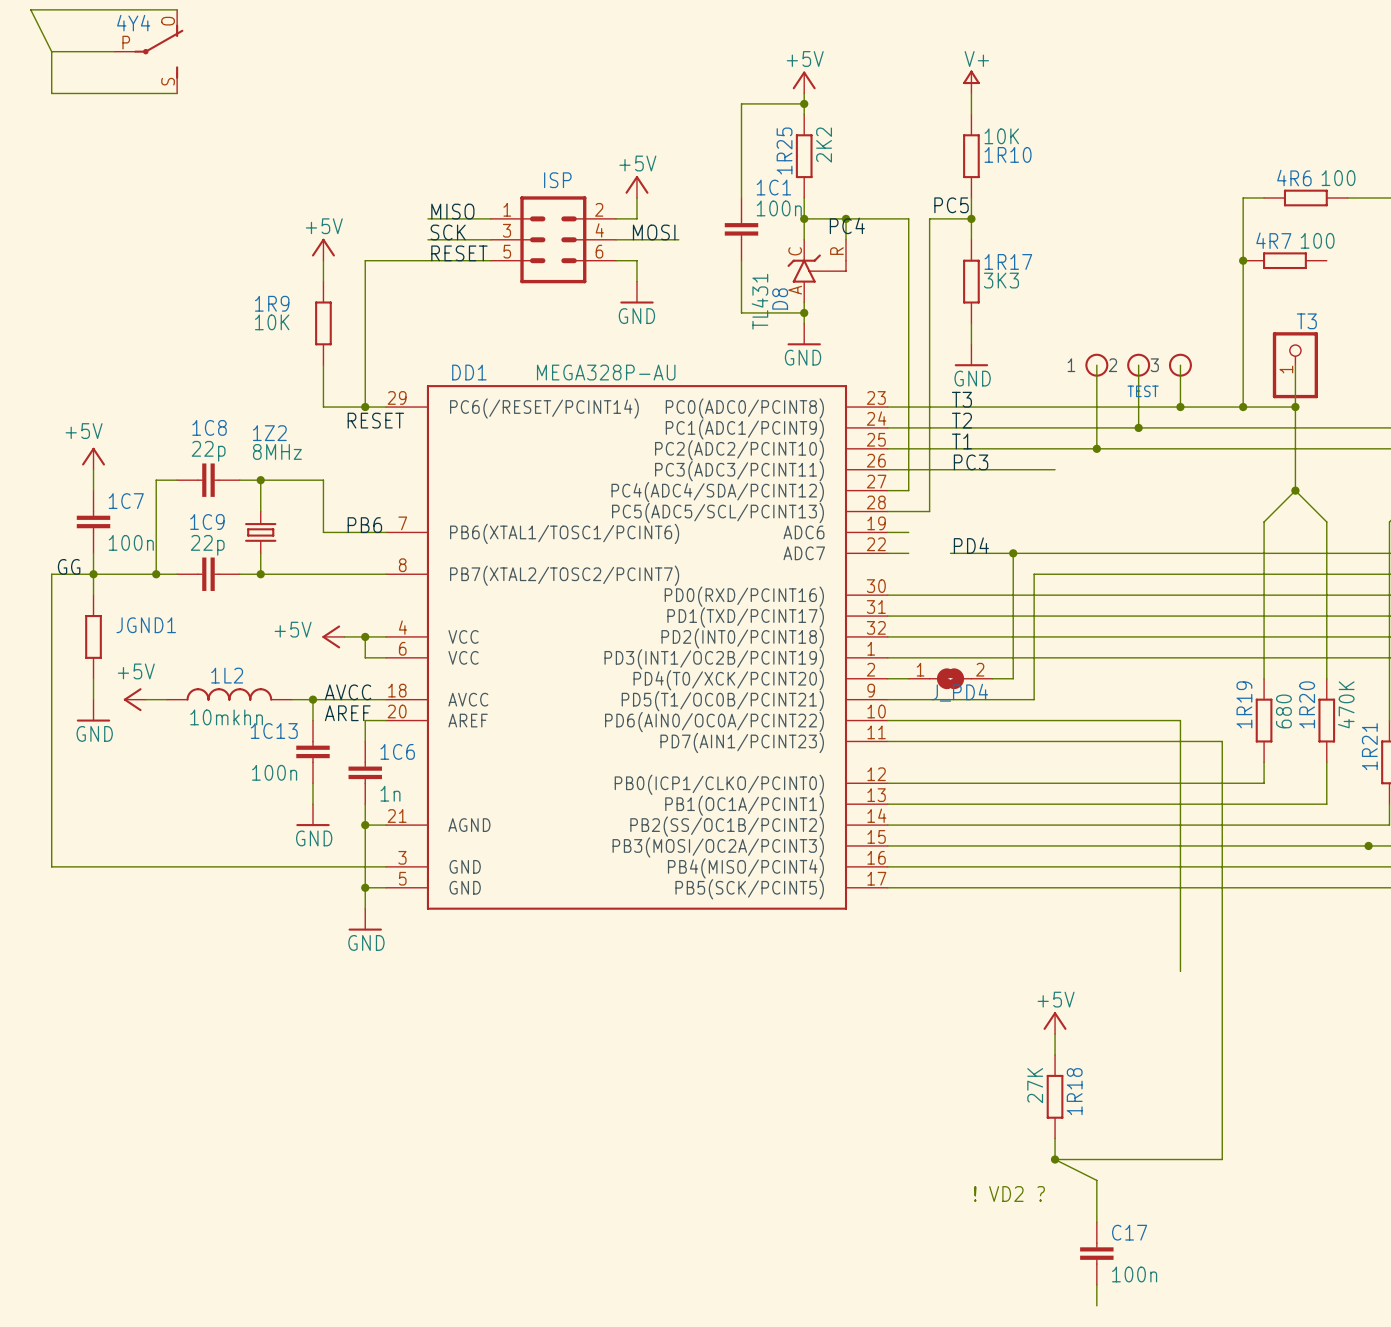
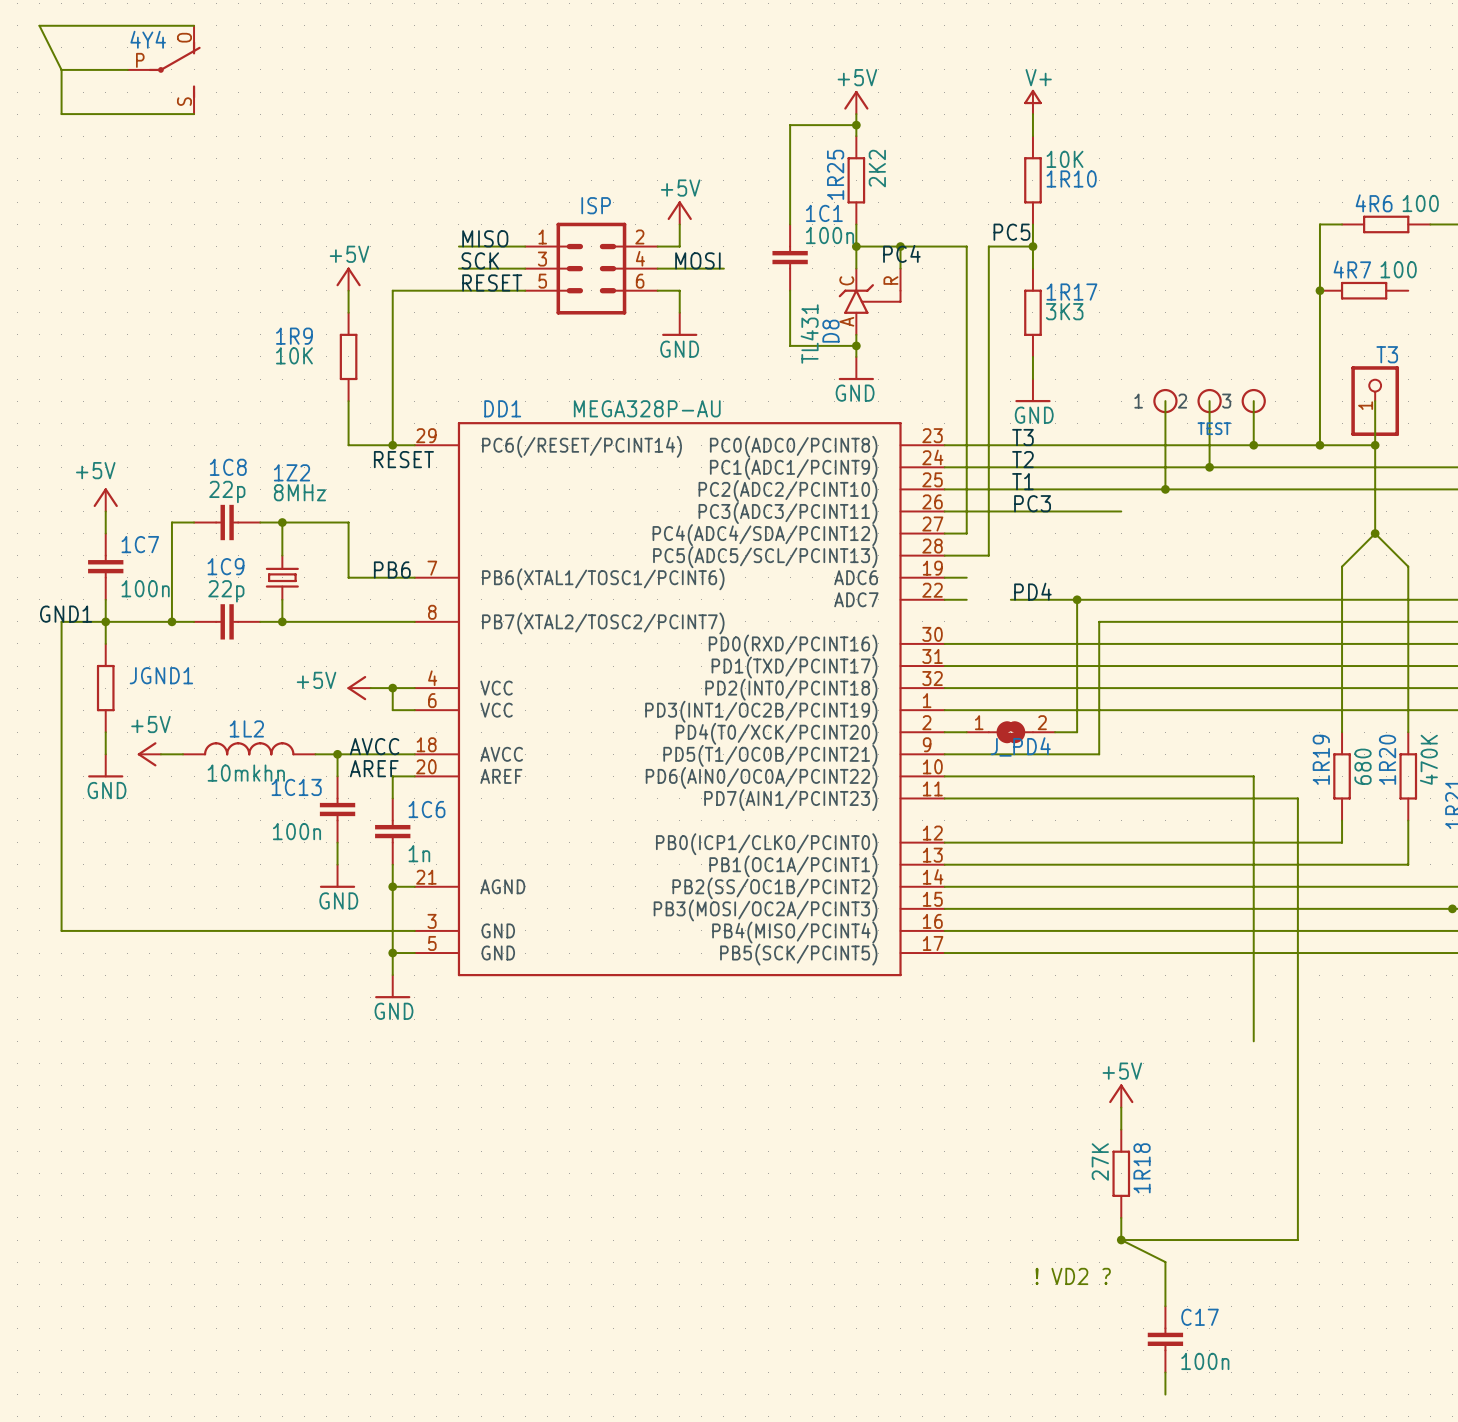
label: GG (69, 566) -> GND1 (66, 614)

